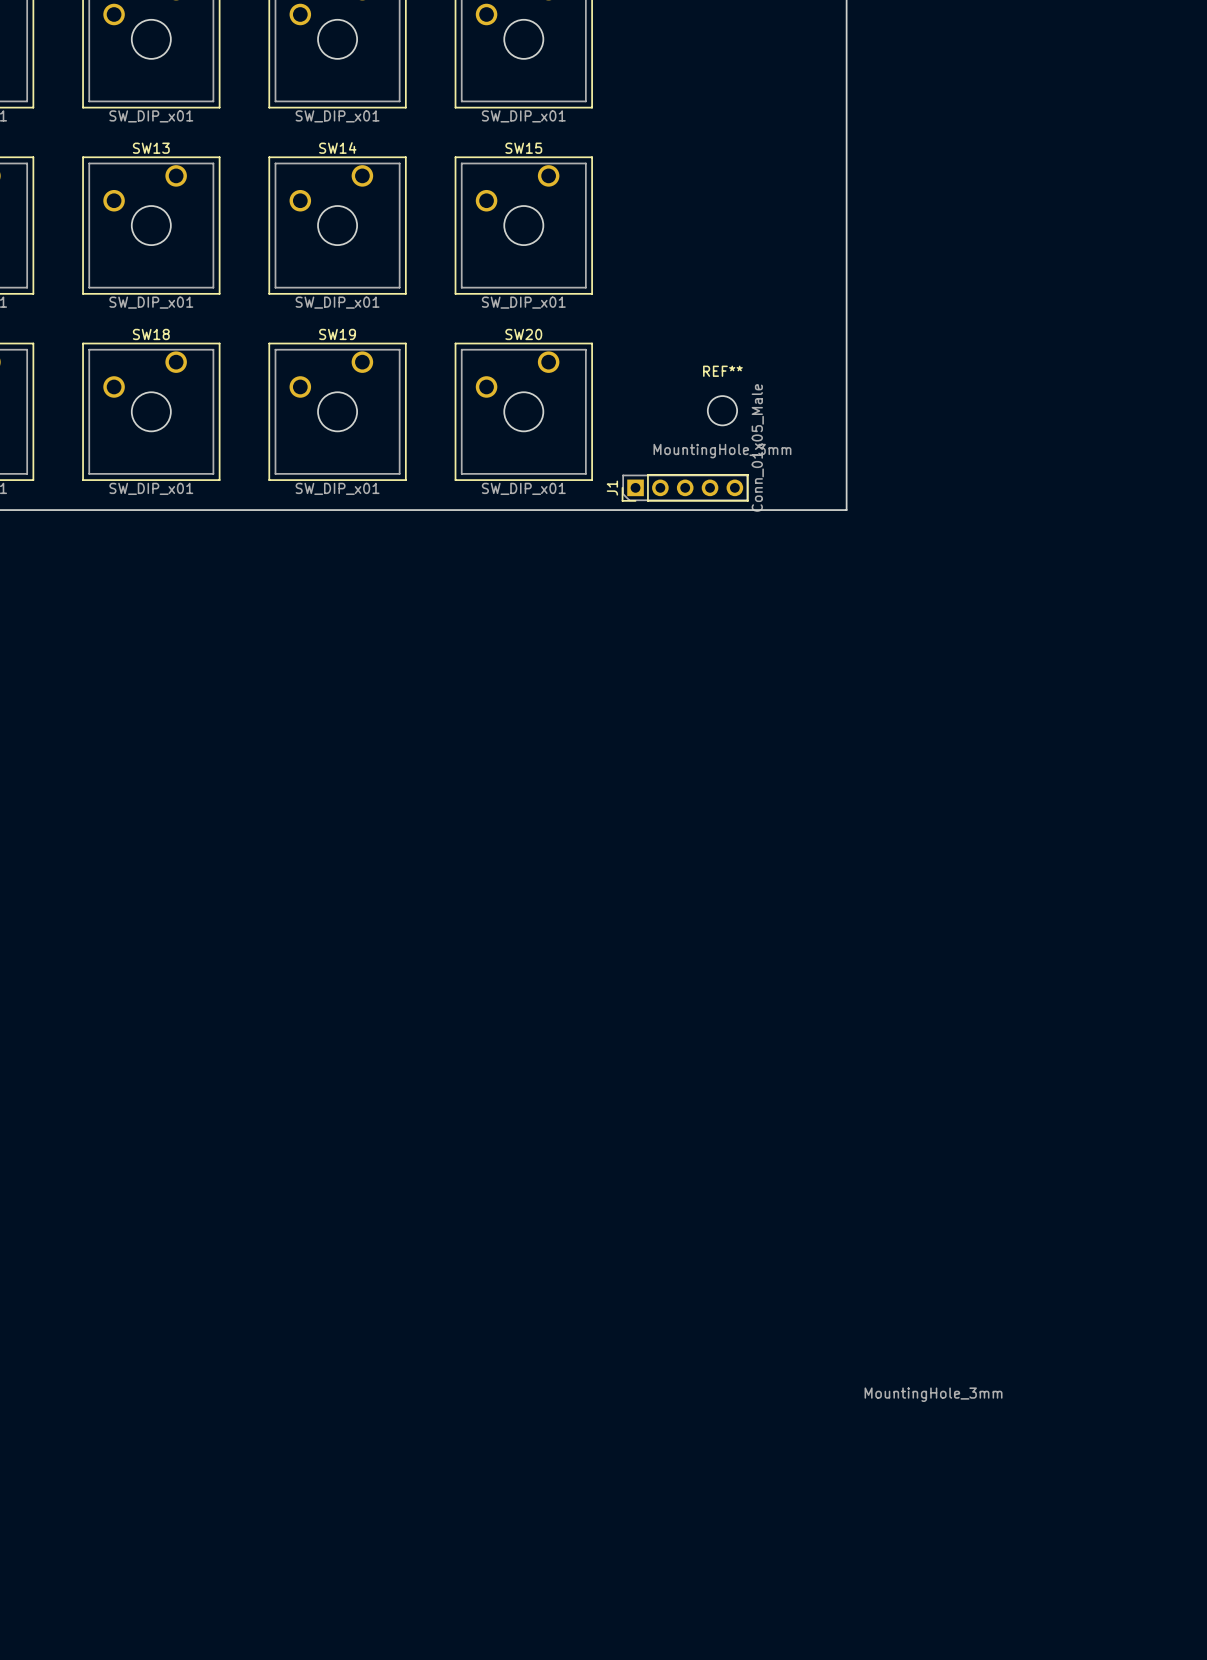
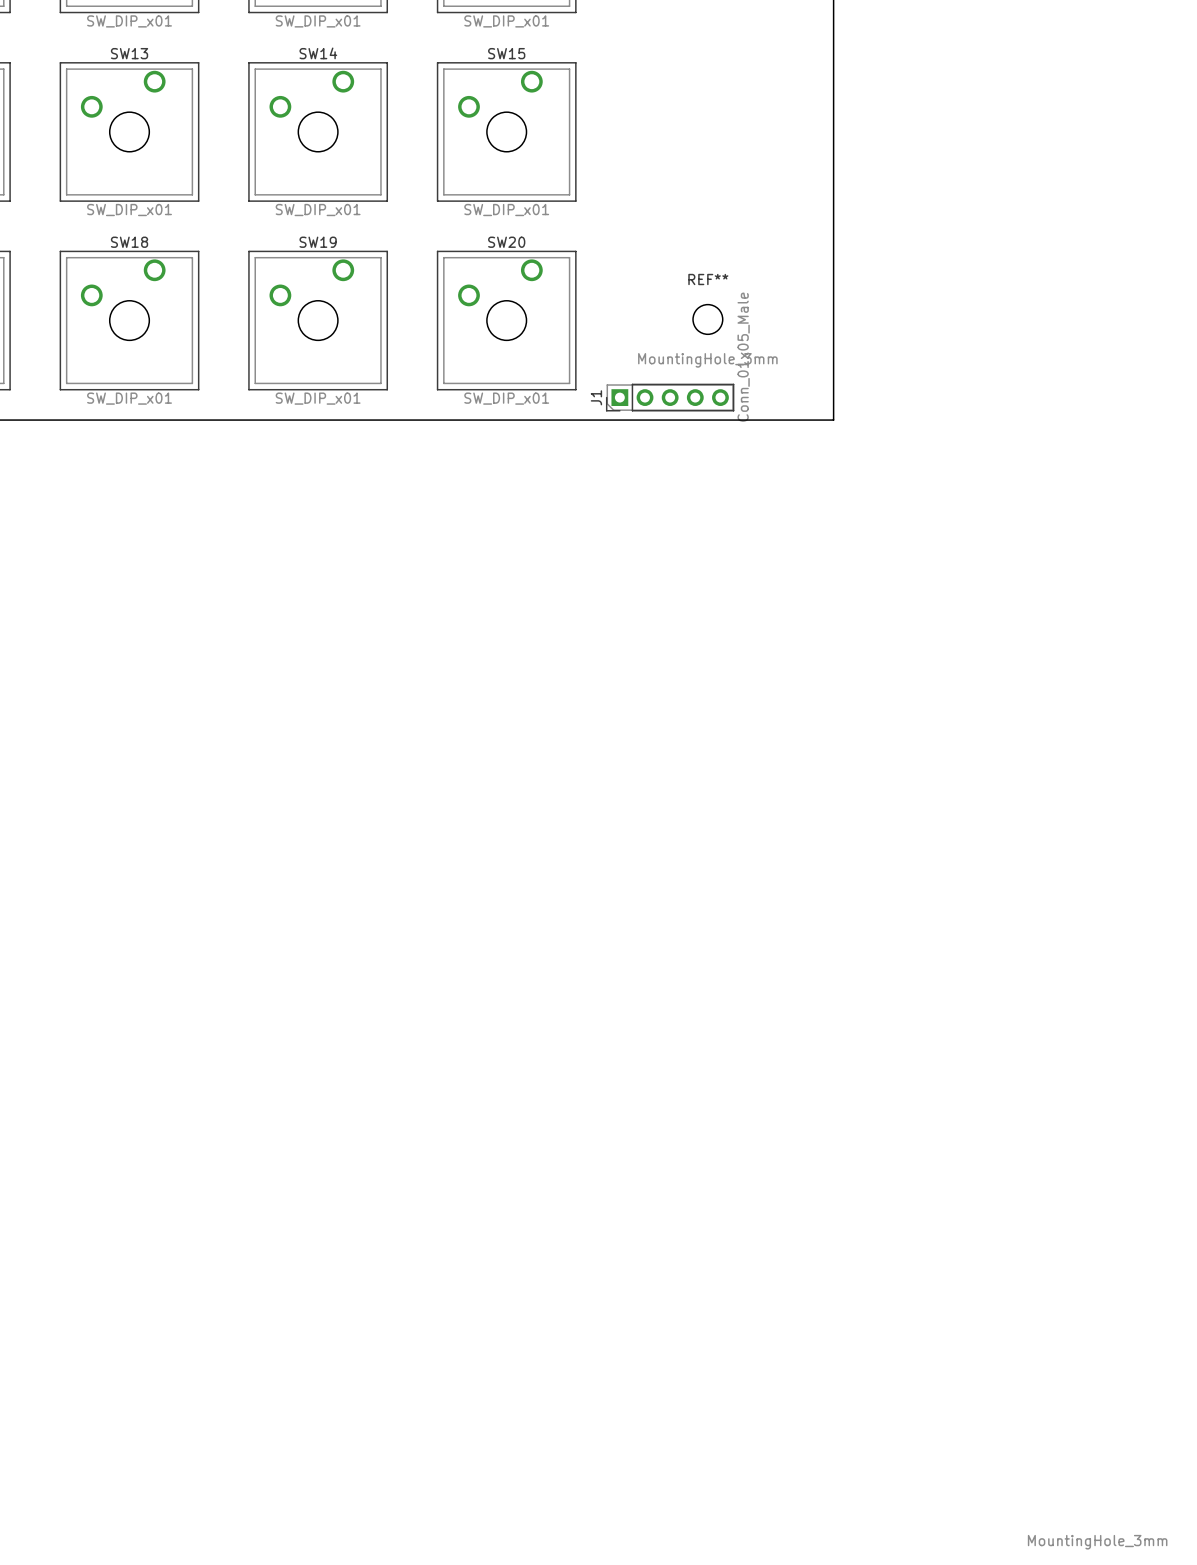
drawing: [864, 1387, 1003, 1402] -> none
drawing: none -> [1027, 1534, 1168, 1550]

